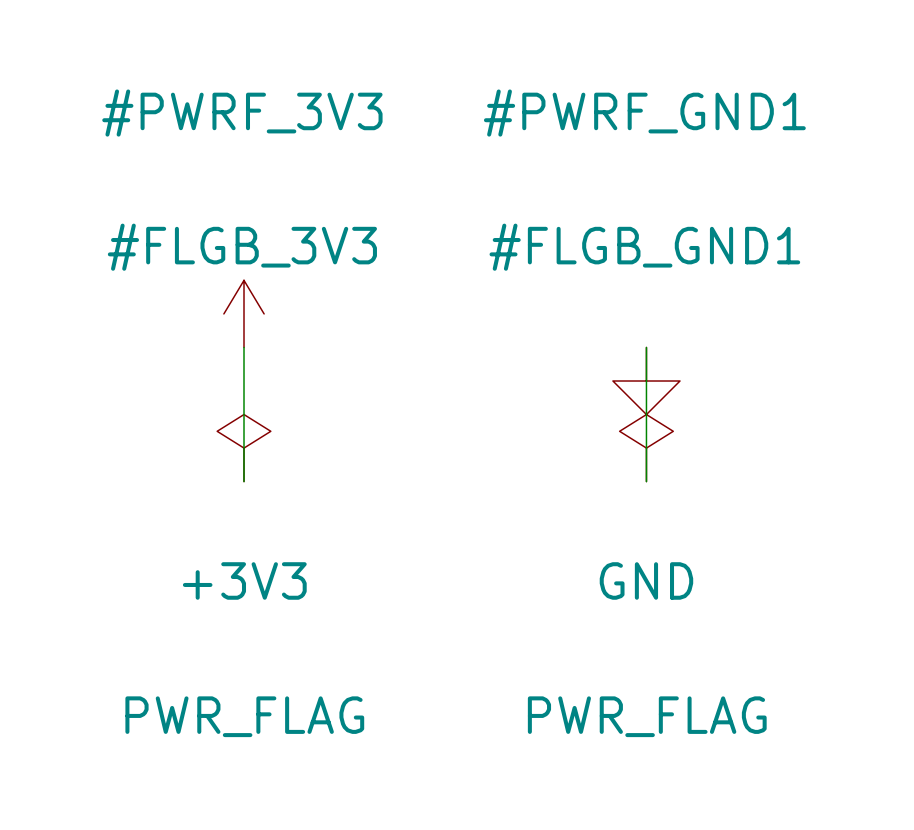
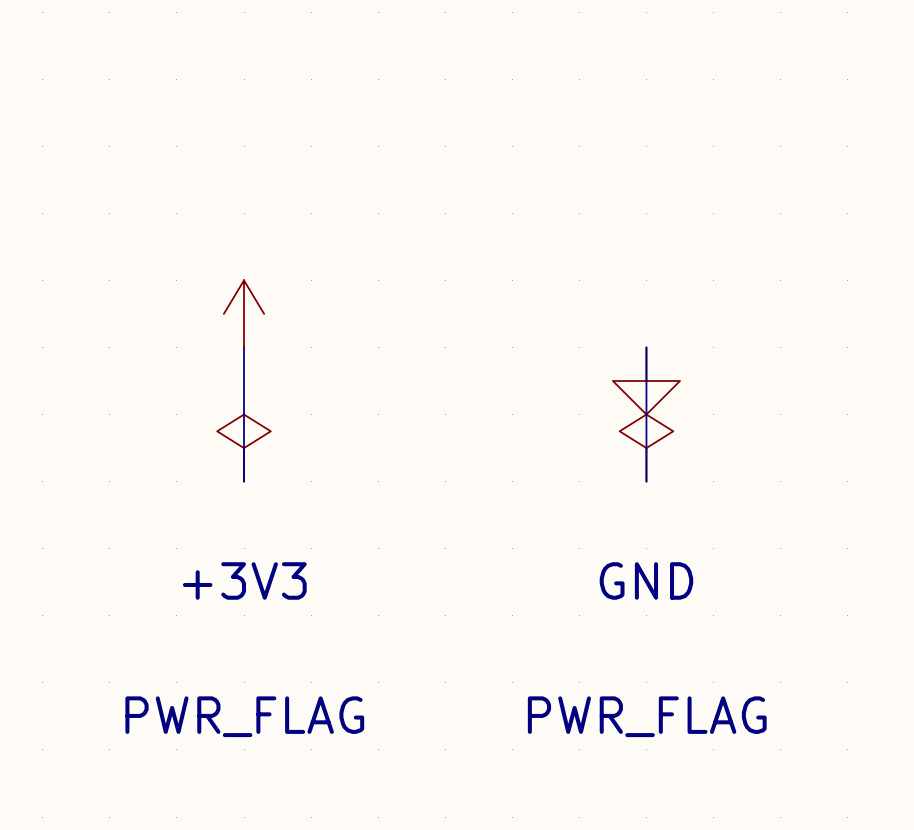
#PWRF_3V3 name: #PWRF_3V3 (242, 113) -> none
#PWRF_GND1 name: #PWRF_GND1 (644, 113) -> none
#FLGB_3V3 name: #FLGB_3V3 (242, 247) -> none
#FLGB_GND1 name: #FLGB_GND1 (644, 247) -> none

